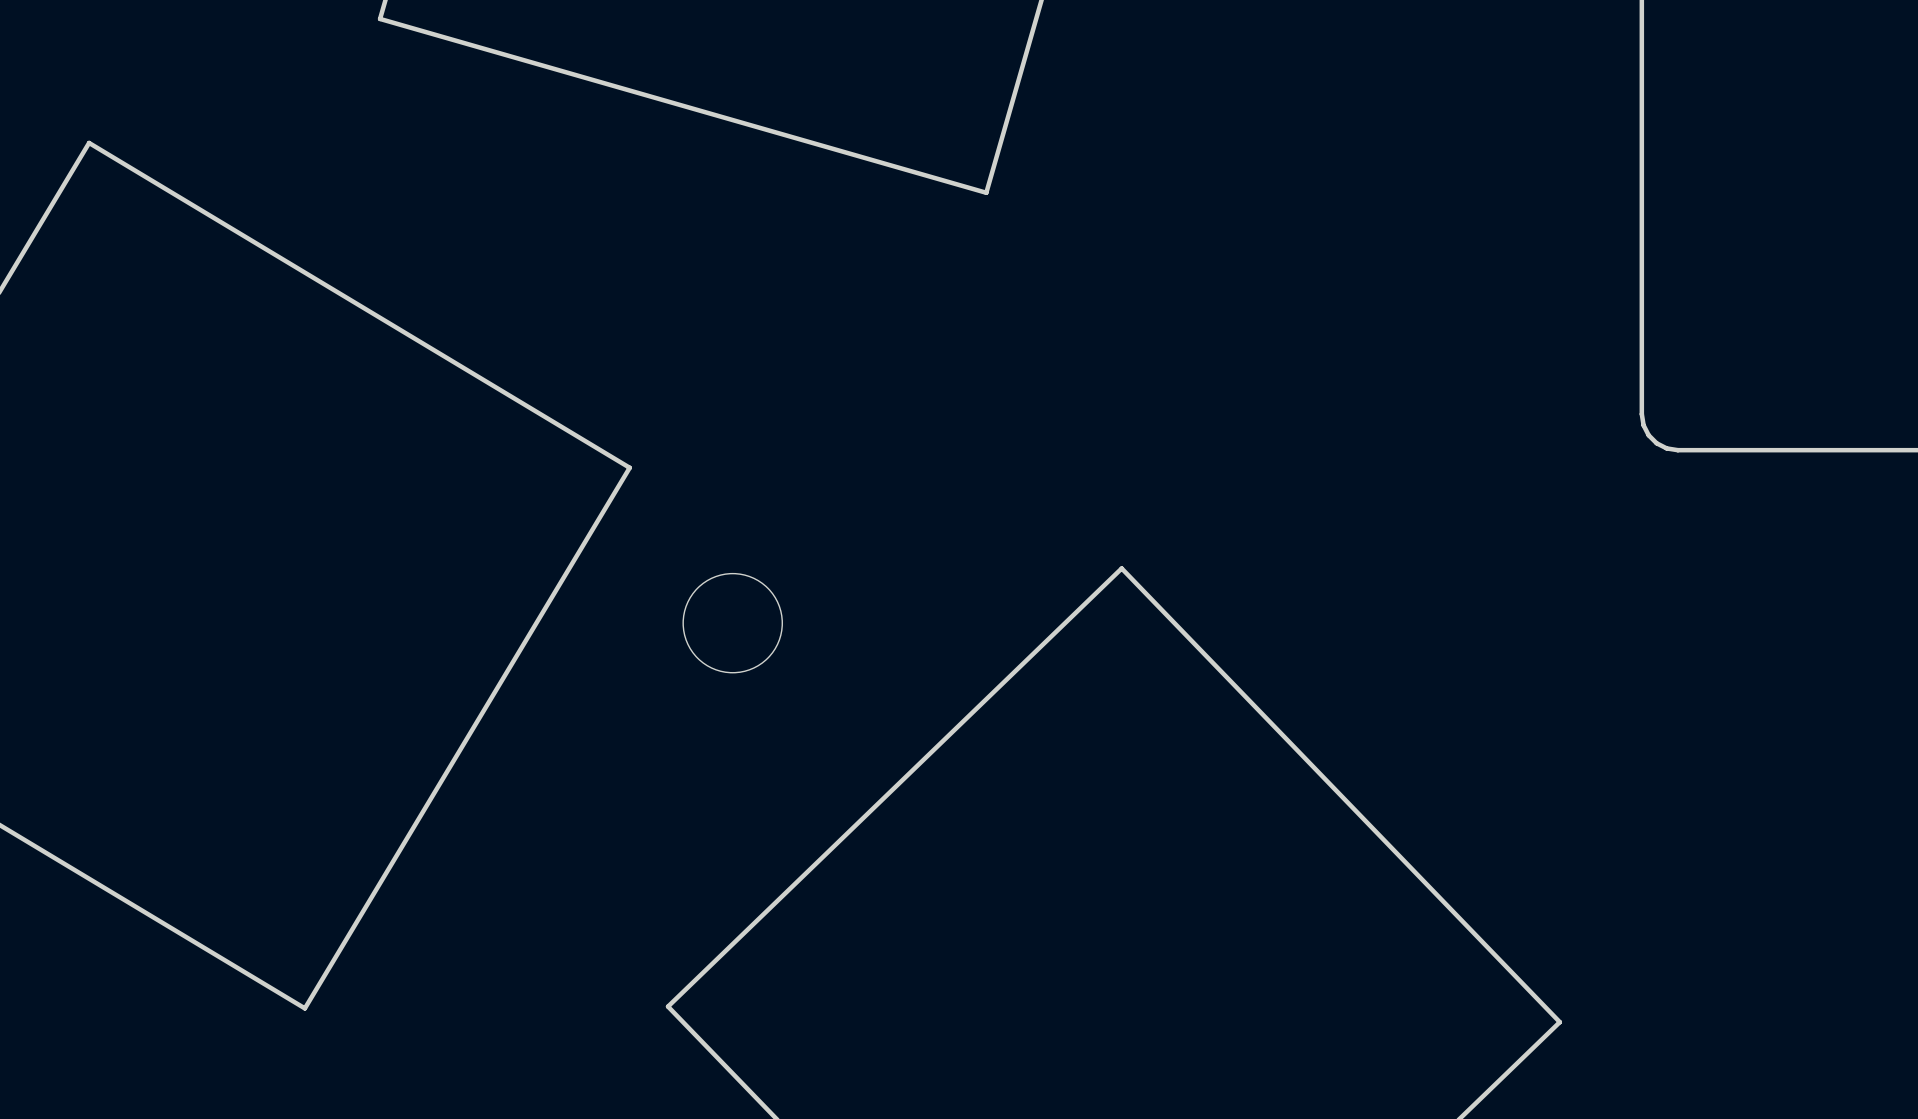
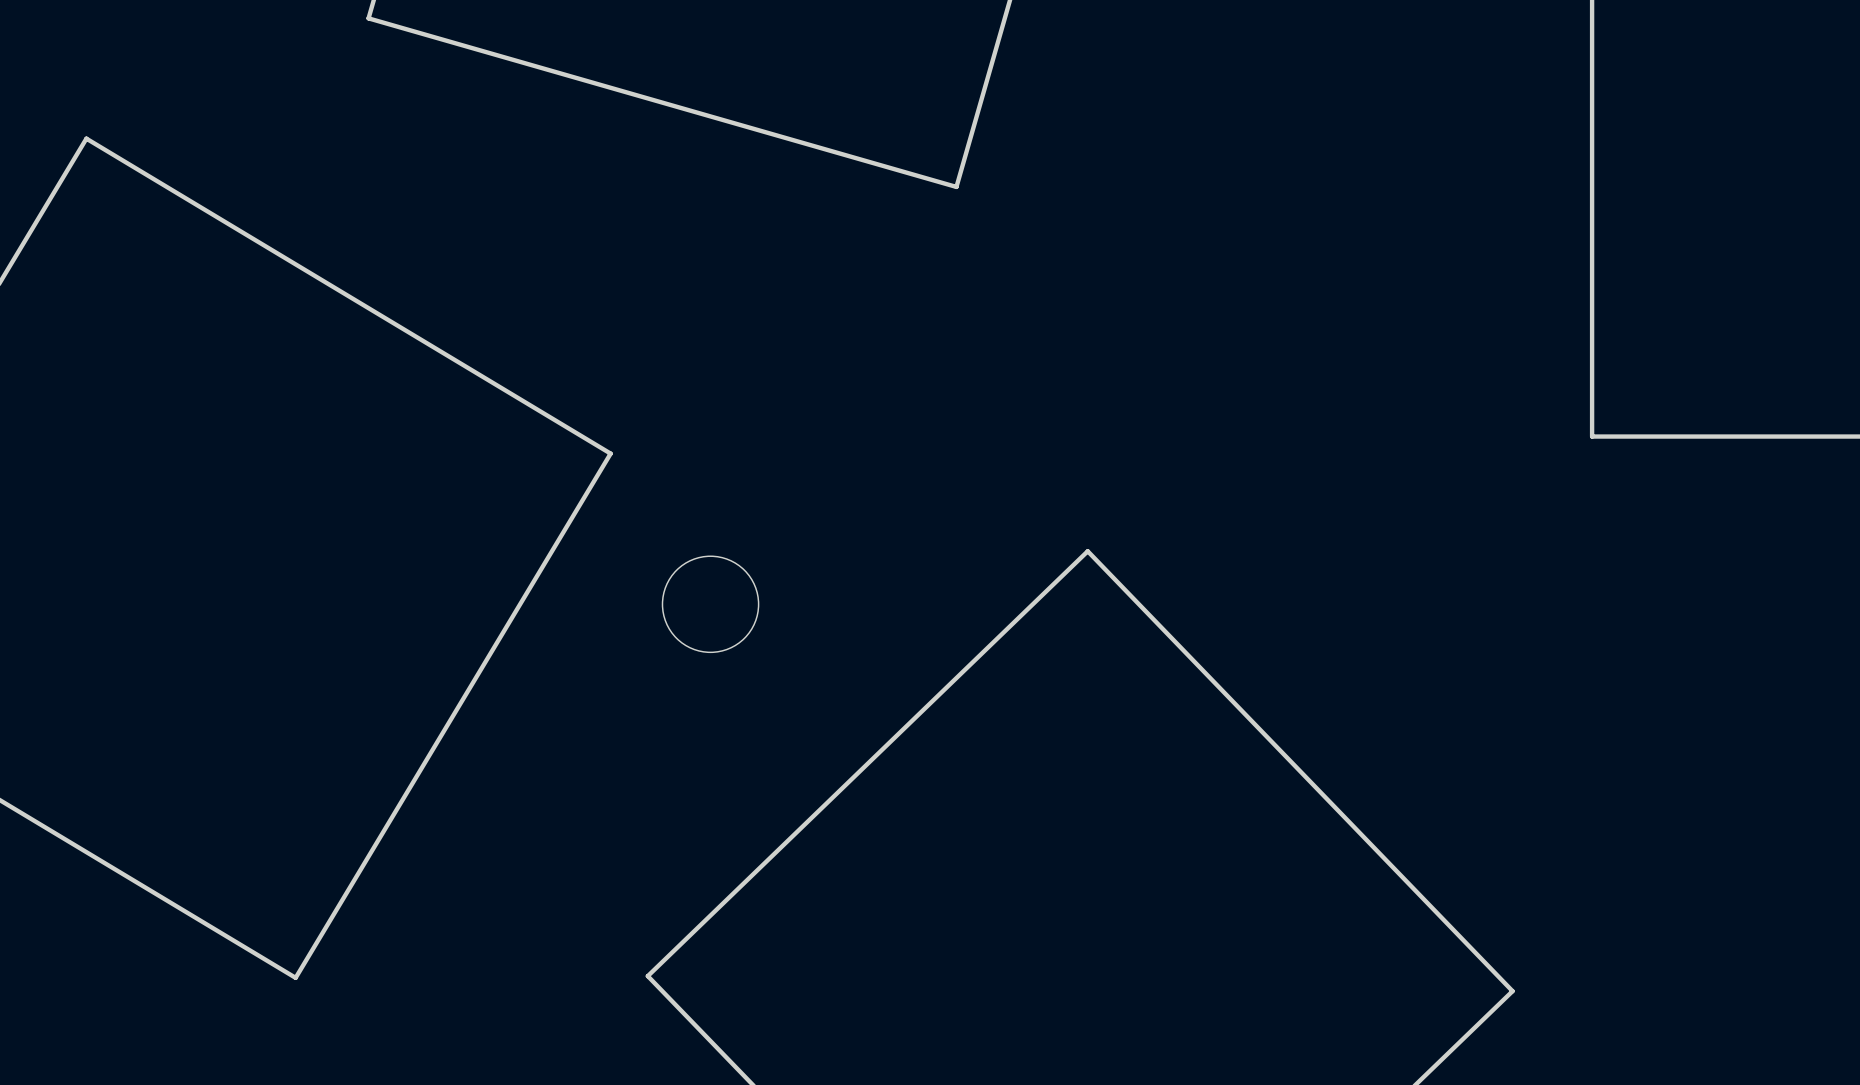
board edge: (1641, 414) (1643, 425) (1648, 435) (1656, 443) (1666, 448) (1677, 450) -> (1592, 401) (1592, 436) (1627, 436)

